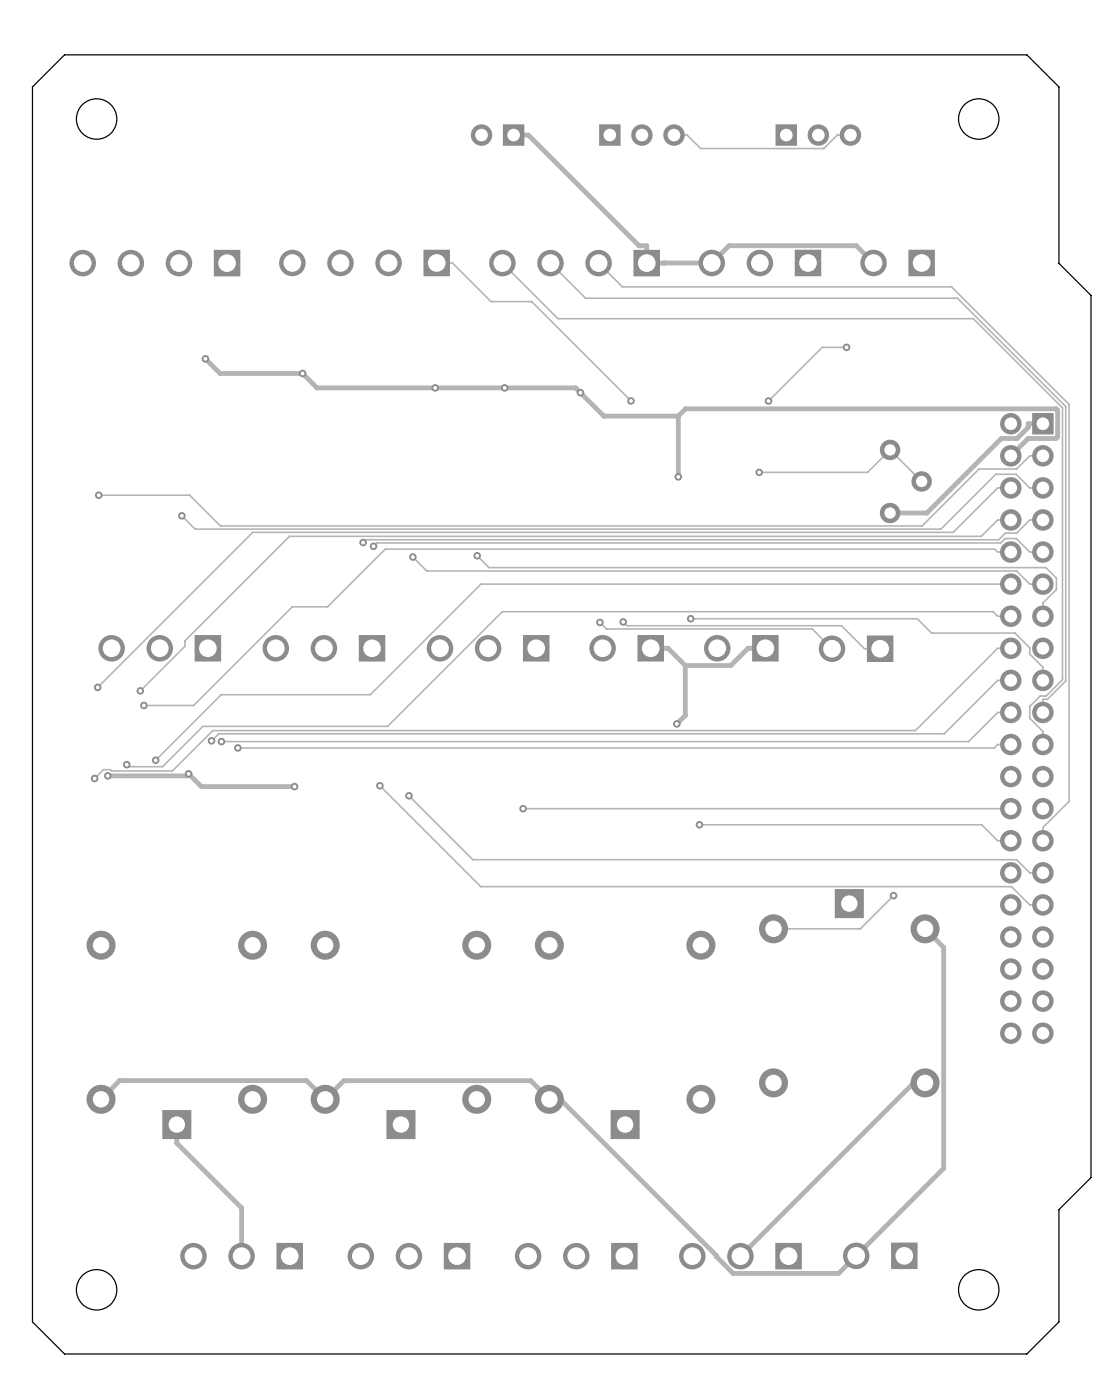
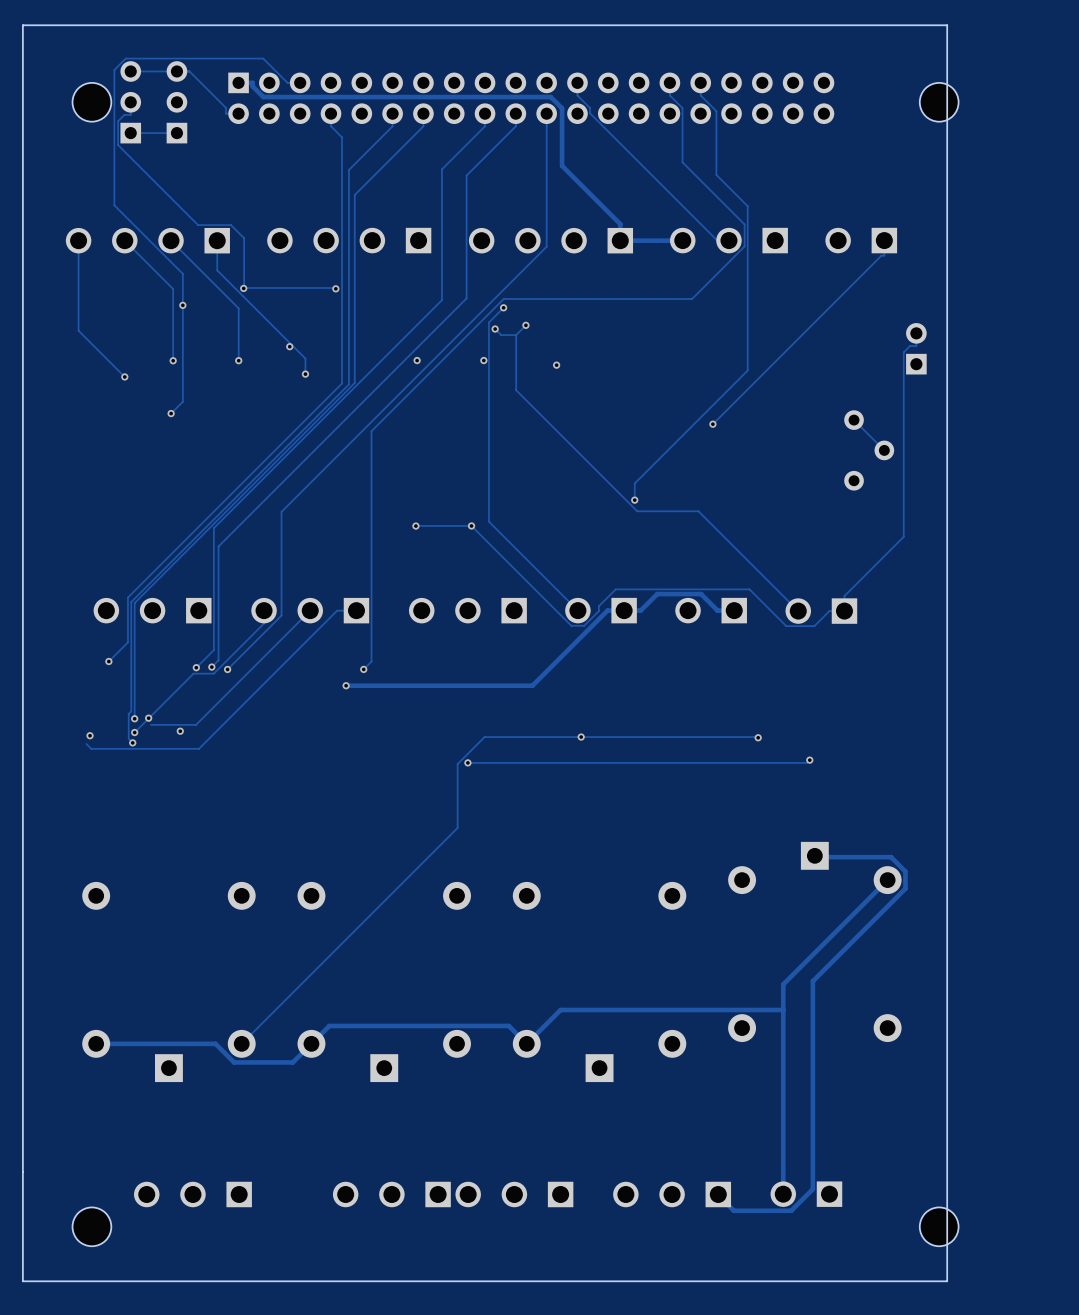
board edge: (1026, 54) (1058, 86) (1058, 263) (1091, 295) (1091, 1177) (1058, 1209) (1058, 1321) (1026, 1353) (64, 1353) (32, 1321) (32, 86) (64, 54) (1026, 54) -> (947, 25) (947, 1281) (22, 1281) (22, 25) (947, 25)
track: none -> (130, 71) (189, 71) (225, 107) (225, 113) (238, 113)
track: none -> (300, 82) (287, 82) (263, 58) (125, 58) (114, 69) (114, 205) (182, 273) (182, 401) (171, 413)
track: none -> (577, 82) (577, 95) (590, 108) (590, 113) (717, 240) (728, 240)
track: none -> (669, 82) (669, 95) (682, 108) (682, 162) (744, 224) (744, 246) (692, 299) (503, 299) (371, 431) (371, 661) (363, 669)
track: none -> (700, 82) (700, 95) (716, 111) (716, 174) (747, 206) (747, 370) (634, 483) (634, 500)
part: none -> (531, 98)
track: none -> (130, 102) (130, 114) (124, 114) (118, 121) (118, 145) (198, 225) (230, 225) (244, 238) (244, 288)
part: none -> (130, 102)
part: none -> (176, 102)
track: none -> (331, 113) (331, 126) (342, 137) (342, 383) (127, 597) (127, 642) (108, 661)
track: none -> (392, 113) (392, 126) (348, 169) (348, 384) (131, 602) (131, 711) (128, 713) (128, 738) (132, 742)
track: none -> (423, 113) (423, 126) (354, 194) (354, 382) (134, 603) (134, 718)
track: none -> (485, 113) (485, 126) (441, 169) (441, 300) (213, 528) (213, 650) (196, 667)
track: none -> (515, 113) (515, 126) (466, 175) (466, 298) (218, 546) (218, 660) (211, 667)
track: none -> (546, 113) (546, 246) (281, 511) (281, 615) (227, 669)
part: (497, 135) -> none
track: (513, 135) (528, 135) (639, 245) (646, 245) -> (238, 82) (252, 82) (252, 86) (263, 97) (550, 97) (562, 108) (562, 165) (620, 224)
part: (641, 135) -> none
part: (818, 135) -> none
track: (850, 135) (837, 135) (823, 148) (700, 148) (687, 135) (674, 135) -> none
track: none -> (176, 133) (130, 133)
track: (436, 262) (452, 262) (491, 301) (531, 301) (630, 400) -> none
track: (873, 262) (856, 245) (729, 245) (711, 262) (664, 262) -> (682, 240) (636, 240)
track: none -> (884, 240) (884, 255) (881, 255) (712, 424)
track: none -> (78, 240) (78, 330) (124, 376)
track: none -> (124, 240) (173, 289) (173, 360)
track: none -> (171, 240) (238, 308) (238, 360)
track: none -> (217, 240) (217, 270) (305, 358) (305, 374)
track: (502, 263) (557, 318) (973, 318) (1062, 407) (1062, 679) (1046, 696) (1040, 696) (1029, 706) (1029, 718) (1042, 731) (1042, 744) -> none
track: (550, 263) (585, 298) (957, 298) (1065, 406) (1065, 681) (1047, 699) (1042, 699) (1042, 712) -> none
track: (598, 263) (622, 286) (951, 286) (1069, 404) (1069, 801) (1042, 827) (1042, 840) -> none
via: none -> (243, 288)
track: none -> (244, 288) (335, 288)
via: none -> (335, 288)
via: none -> (182, 305)
track: none -> (503, 307) (488, 322) (488, 521) (577, 610)
via: none -> (503, 307)
track: (846, 347) (822, 347) (768, 401) -> none
via: (846, 347) -> none
track: none -> (525, 325) (516, 335)
via: none -> (525, 325)
track: none -> (495, 329) (501, 335) (516, 335)
via: none -> (495, 329)
track: (205, 358) (220, 373) (302, 373) (317, 387) (575, 387) (603, 416) (678, 416) -> none
via: (205, 358) -> none
track: none -> (916, 333) (916, 345) (910, 345) (903, 352) (903, 536) (844, 596) (844, 611)
part: none -> (916, 348)
via: none -> (173, 360)
via: none -> (238, 360)
via: (630, 400) -> none
via: (768, 401) -> none
via: none -> (305, 374)
via: none -> (124, 376)
track: (678, 416) (685, 408) (1056, 408) (1057, 436) (1056, 438) (1028, 438) (1010, 455) -> none
track: (678, 416) (678, 476) -> none
track: (1042, 423) (1028, 423) (1028, 427) (1017, 438) (1001, 438) (926, 513) (890, 513) -> none
via: none -> (171, 413)
track: (890, 449) (867, 472) (759, 472) -> none
track: (1042, 455) (1029, 455) (1016, 468) (979, 468) (922, 525) (220, 525) (189, 495) (98, 495) -> none
via position: (759, 472) -> (712, 424)
via: (678, 476) -> none
track: (1010, 487) (997, 487) (953, 532) (252, 532) (97, 687) -> none
track: (1042, 487) (1029, 487) (1016, 474) (995, 474) (940, 529) (195, 529) (181, 515) -> none
via: (98, 495) -> none
via: (181, 515) -> none
track: (1010, 519) (997, 519) (981, 536) (289, 536) (184, 640) (184, 646) (140, 690) -> none
track: (1042, 519) (1029, 519) (1016, 533) (1005, 533) (998, 539) (365, 539) (363, 542) -> none
via: none -> (634, 500)
via: (363, 542) -> none
track: (373, 546) (376, 542) (1000, 542) (1005, 538) (1016, 538) (1029, 552) (1042, 552) -> none
via: (373, 546) -> none
track: (1010, 552) (997, 552) (994, 549) (385, 549) (327, 606) (292, 606) (193, 705) (143, 705) -> none
track: (477, 555) (489, 567) (1045, 567) (1056, 578) (1056, 589) (1042, 603) (1042, 616) -> none
via position: (477, 555) -> (471, 525)
track: (412, 557) (426, 570) (1016, 570) (1029, 584) (1042, 584) -> none
via position: (412, 557) -> (415, 526)
track: (1010, 584) (480, 584) (370, 694) (221, 694) (155, 760) -> none
track: (1010, 616) (997, 616) (993, 611) (502, 611) (387, 726) (202, 726) (162, 766) (128, 766) (126, 764) -> none
track: (690, 618) (917, 618) (931, 633) (1014, 633) (1029, 647) (1029, 654) (1042, 667) (1042, 680) -> none
via: (690, 618) -> none
track: (623, 621) (627, 625) (841, 625) (864, 648) -> (415, 525) (471, 525) (571, 625) (584, 625) (598, 611) (598, 606) (615, 589) (749, 589) (786, 626) (814, 626) (829, 611)
via: (623, 621) -> none
track: (599, 622) (606, 628) (812, 628) -> (516, 335) (516, 390) (637, 511) (698, 511) (779, 592)
via: (599, 622) -> none
track: none -> (264, 610) (264, 623) (213, 673) (193, 673) (134, 732)
track: none -> (310, 610) (196, 724) (150, 724)
track: none -> (356, 610) (337, 610) (198, 748) (91, 748) (86, 743)
track: none -> (624, 610) (607, 610) (532, 685) (346, 685)
track: (668, 648) (685, 665) -> none
track: (748, 648) (730, 665) (685, 665) -> (717, 610) (701, 594) (657, 594) (640, 610)
track: (1010, 648) (997, 648) (915, 730) (212, 730) (172, 770) (103, 769) (94, 778) -> none
track: (685, 665) (685, 715) (676, 723) -> none
track: (1010, 680) (997, 680) (944, 733) (218, 733) (211, 740) -> none
via: (97, 687) -> none
via: (140, 690) -> none
via: none -> (108, 661)
via: (143, 705) -> none
via: none -> (196, 667)
via: none -> (211, 667)
via: none -> (227, 669)
via: none -> (363, 669)
track: (1010, 712) (997, 712) (968, 741) (221, 741) -> none
via: (676, 723) -> none
via: none -> (346, 685)
part: (1026, 728) -> none
via: (211, 740) -> none
via: (221, 741) -> none
track: (1010, 744) (997, 744) (994, 747) (237, 747) -> none
via: (237, 747) -> none
via: none -> (134, 718)
via: (126, 764) -> none
track: (107, 775) (186, 775) (188, 773) (201, 786) (294, 786) -> none
via: (107, 775) -> none
via: none -> (134, 732)
via: none -> (581, 737)
track: none -> (758, 737) (484, 737) (457, 764) (457, 827) (241, 1043)
via: none -> (758, 737)
via: none -> (132, 742)
track: (379, 785) (480, 886) (1011, 886) (1029, 904) (1042, 904) -> none
via: (379, 785) -> none
via: (294, 786) -> none
track: (408, 795) (472, 859) (1016, 859) (1029, 872) (1042, 872) -> none
via: (408, 795) -> none
track: none -> (809, 760) (807, 762) (467, 762)
via: none -> (809, 760)
via position: (523, 808) -> (467, 762)
track: (1010, 808) (523, 808) -> none
track: (699, 824) (981, 824) (997, 840) (1010, 840) -> none
via: (699, 824) -> none
track: (893, 895) (860, 928) (773, 928) -> none
via: (893, 895) -> none
track: none -> (808, 857) (891, 857) (905, 871) (905, 888) (812, 981) (812, 1189) (791, 1210) (733, 1210) (718, 1194)
track: (925, 928) (943, 947) (943, 1168) (838, 1273) (733, 1273) (560, 1099) (549, 1099) -> (783, 1009) (560, 1009) (526, 1043)
track: none -> (887, 880) (783, 984) (783, 1194)
track: (925, 1082) (913, 1082) (740, 1256) -> none
track: (325, 1099) (306, 1080) (119, 1080) (101, 1099) -> (311, 1043) (292, 1062) (234, 1062) (215, 1043) (96, 1043)
track: (176, 1124) (176, 1143) (241, 1207) (241, 1256) -> none
part position: (880, 1255) -> (806, 1194)
part position: (241, 1256) -> (192, 1194)
part position: (576, 1256) -> (514, 1194)
part position: (740, 1256) -> (672, 1194)

